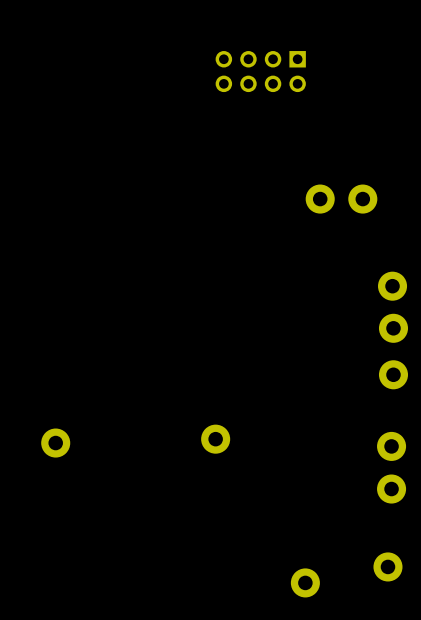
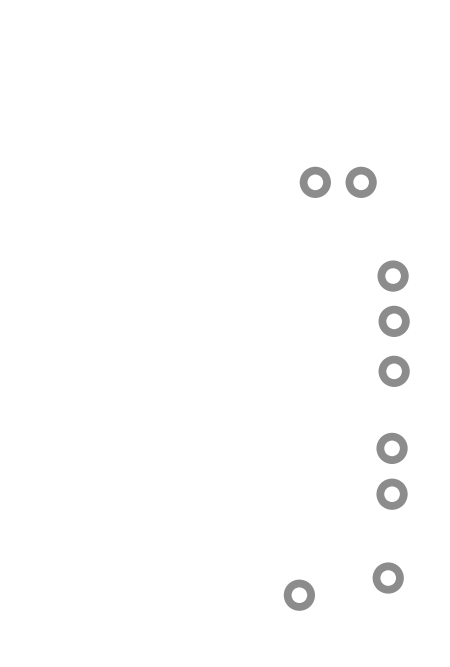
part: (260, 71) -> none
part: (215, 439) -> none
part: (55, 443) -> none

